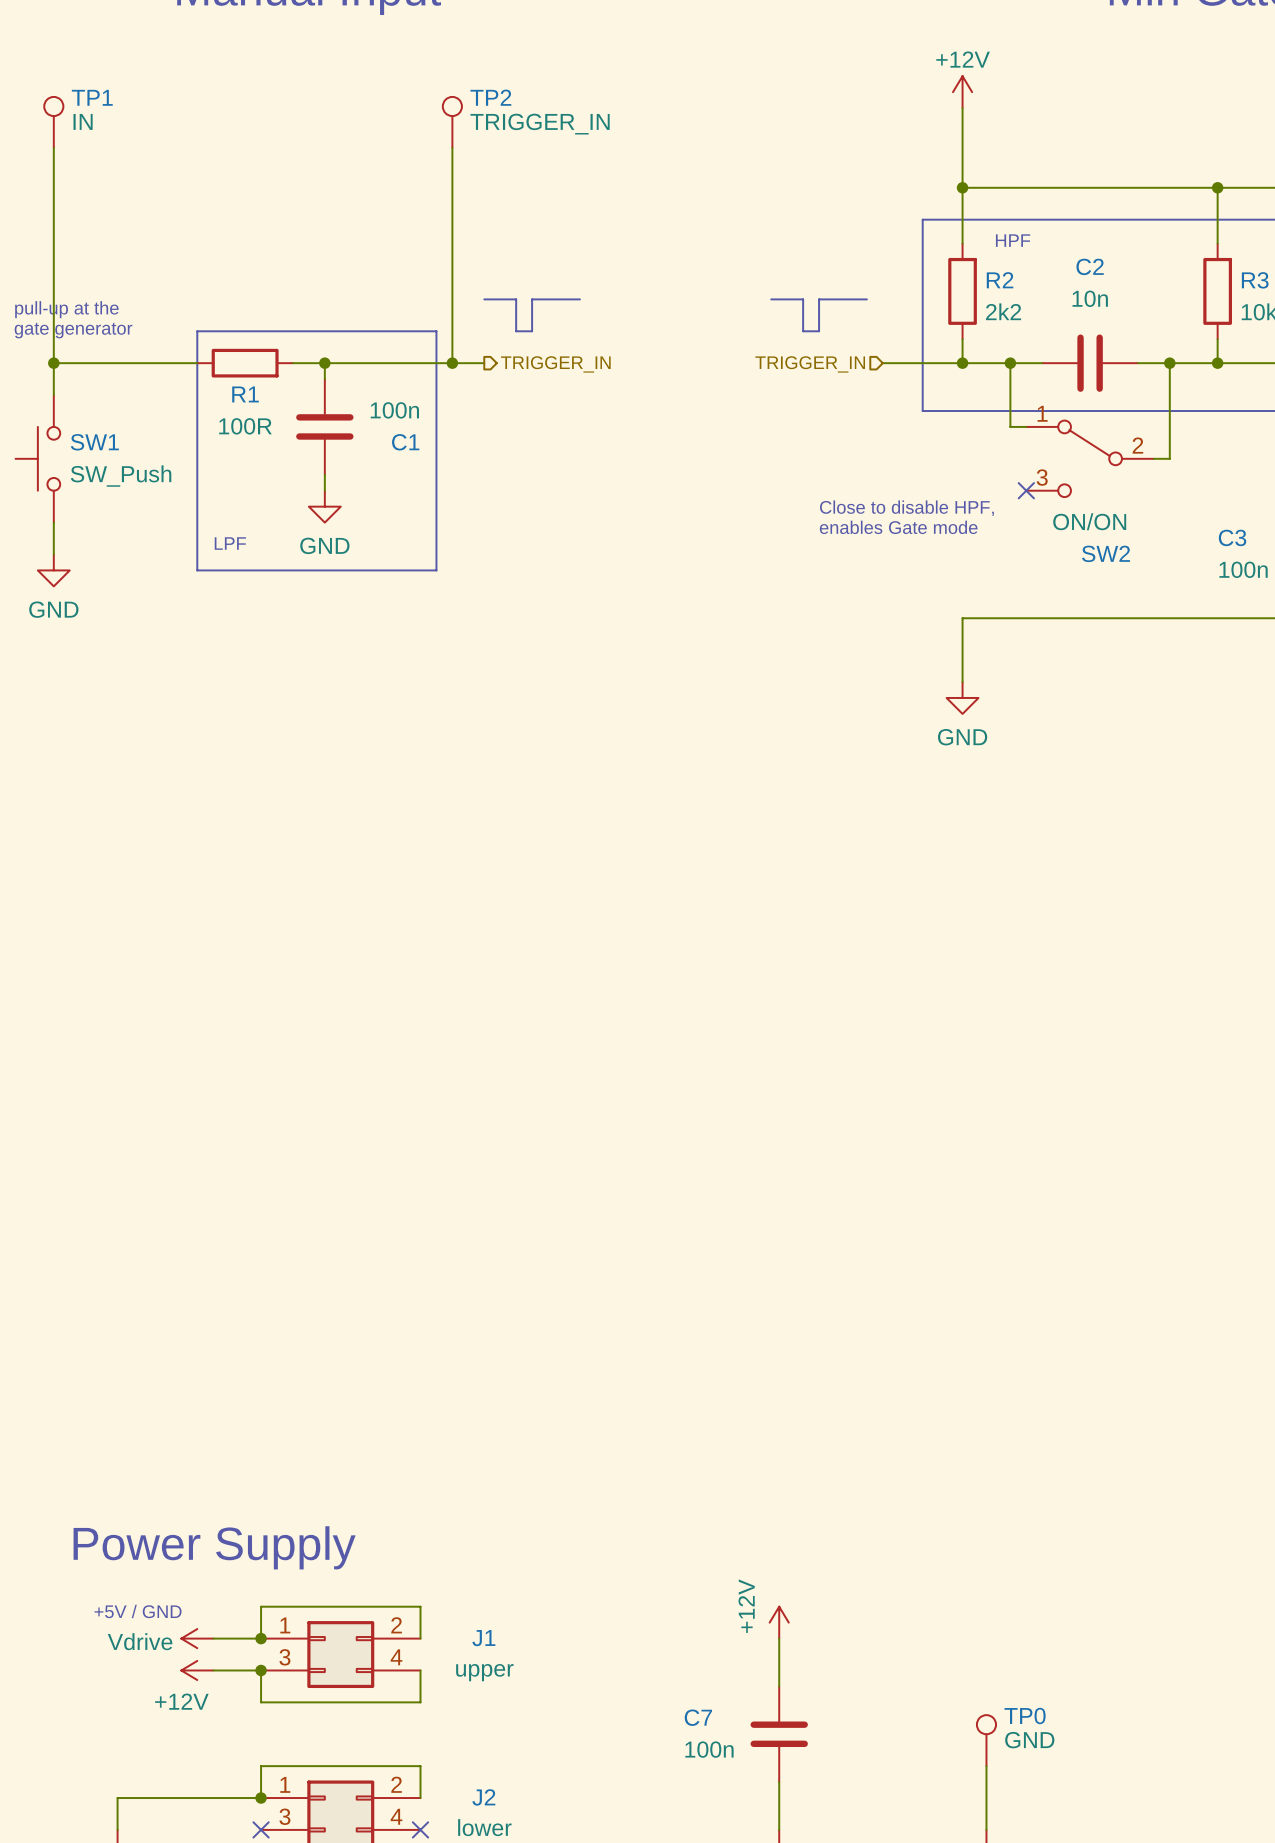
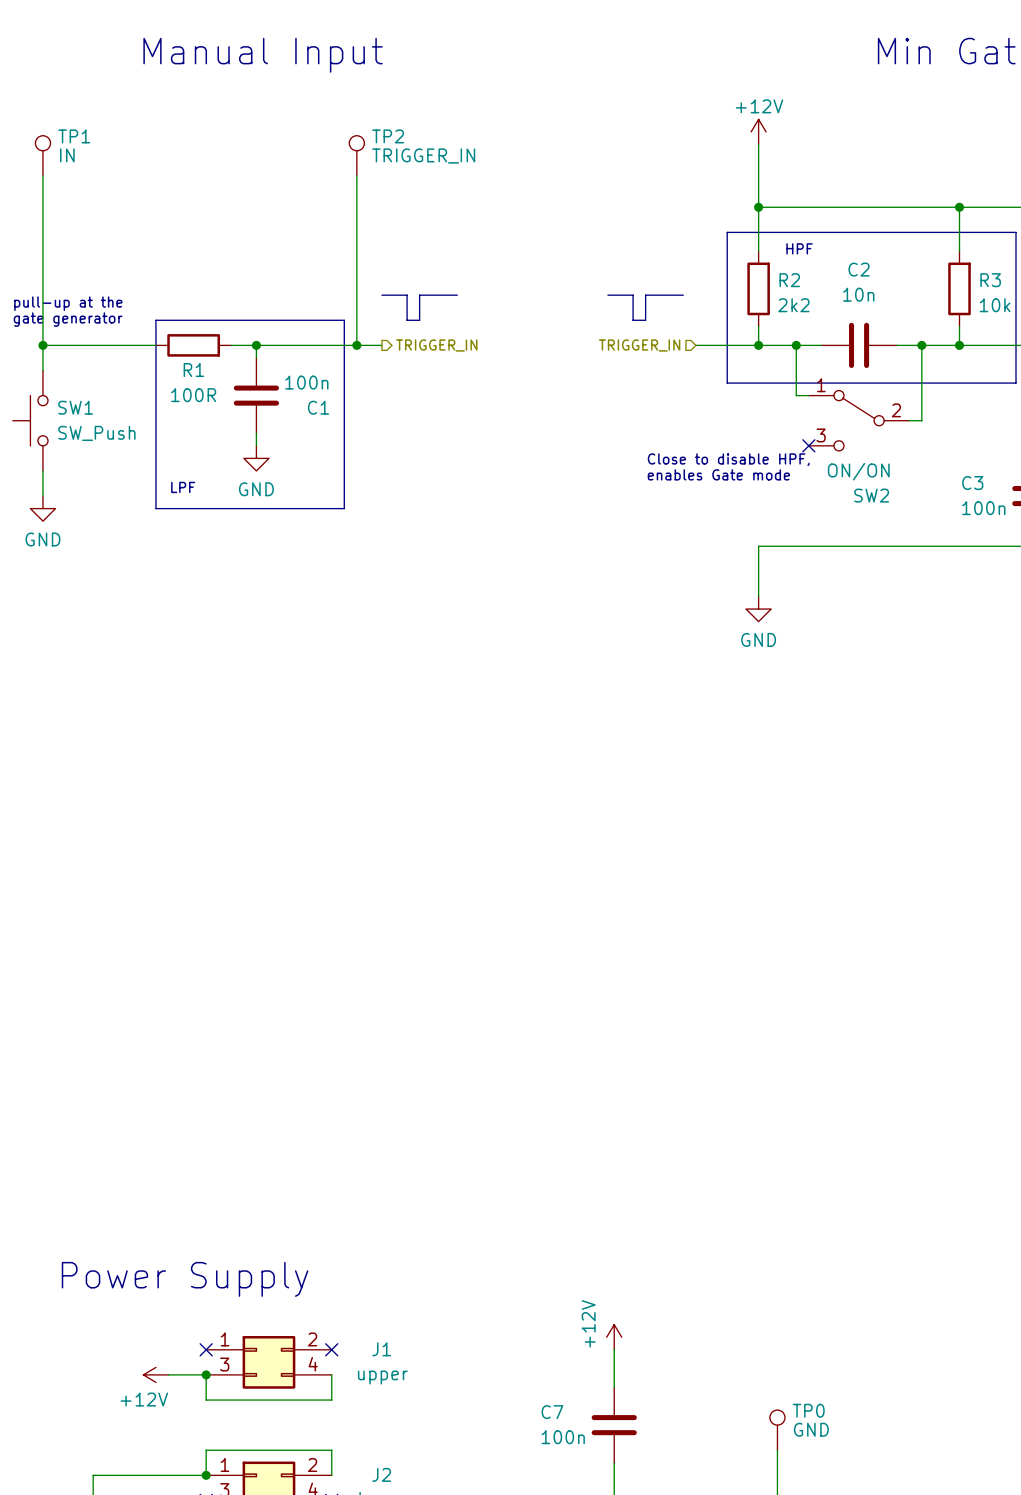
text: +5V / GND (138, 1611) -> none
power symbol: Vdrive (197, 1638) -> none
wire: (213, 1638) (261, 1638) (261, 1606) (420, 1606) (420, 1638) -> none
junction: (261, 1638) -> none
no-connect mark: none -> (206, 1349)
no-connect mark: none -> (331, 1349)

